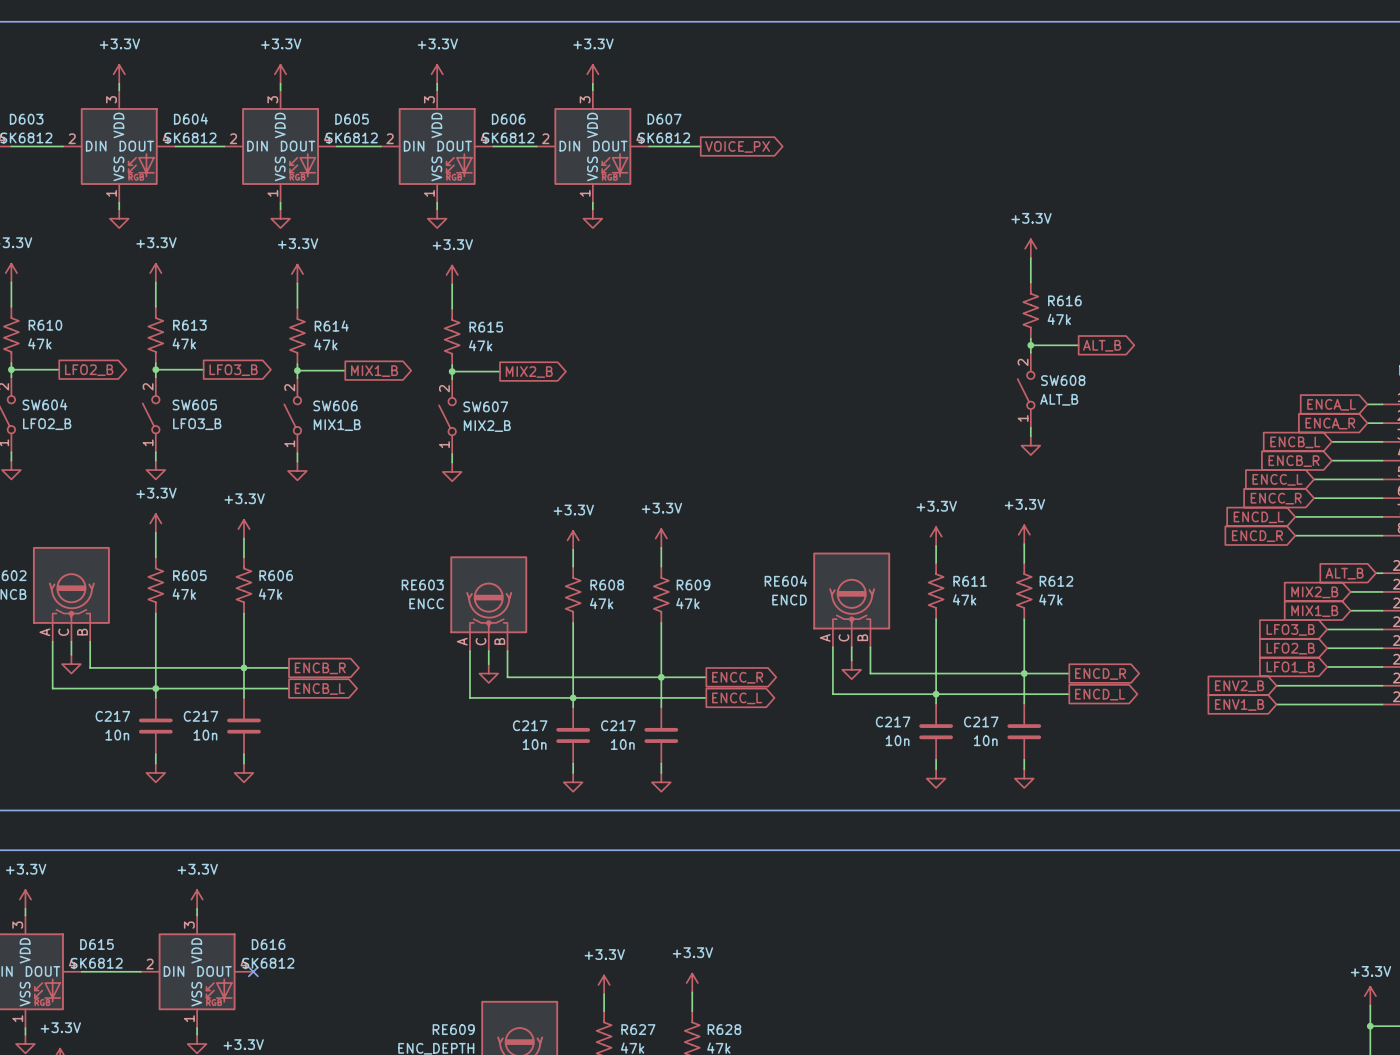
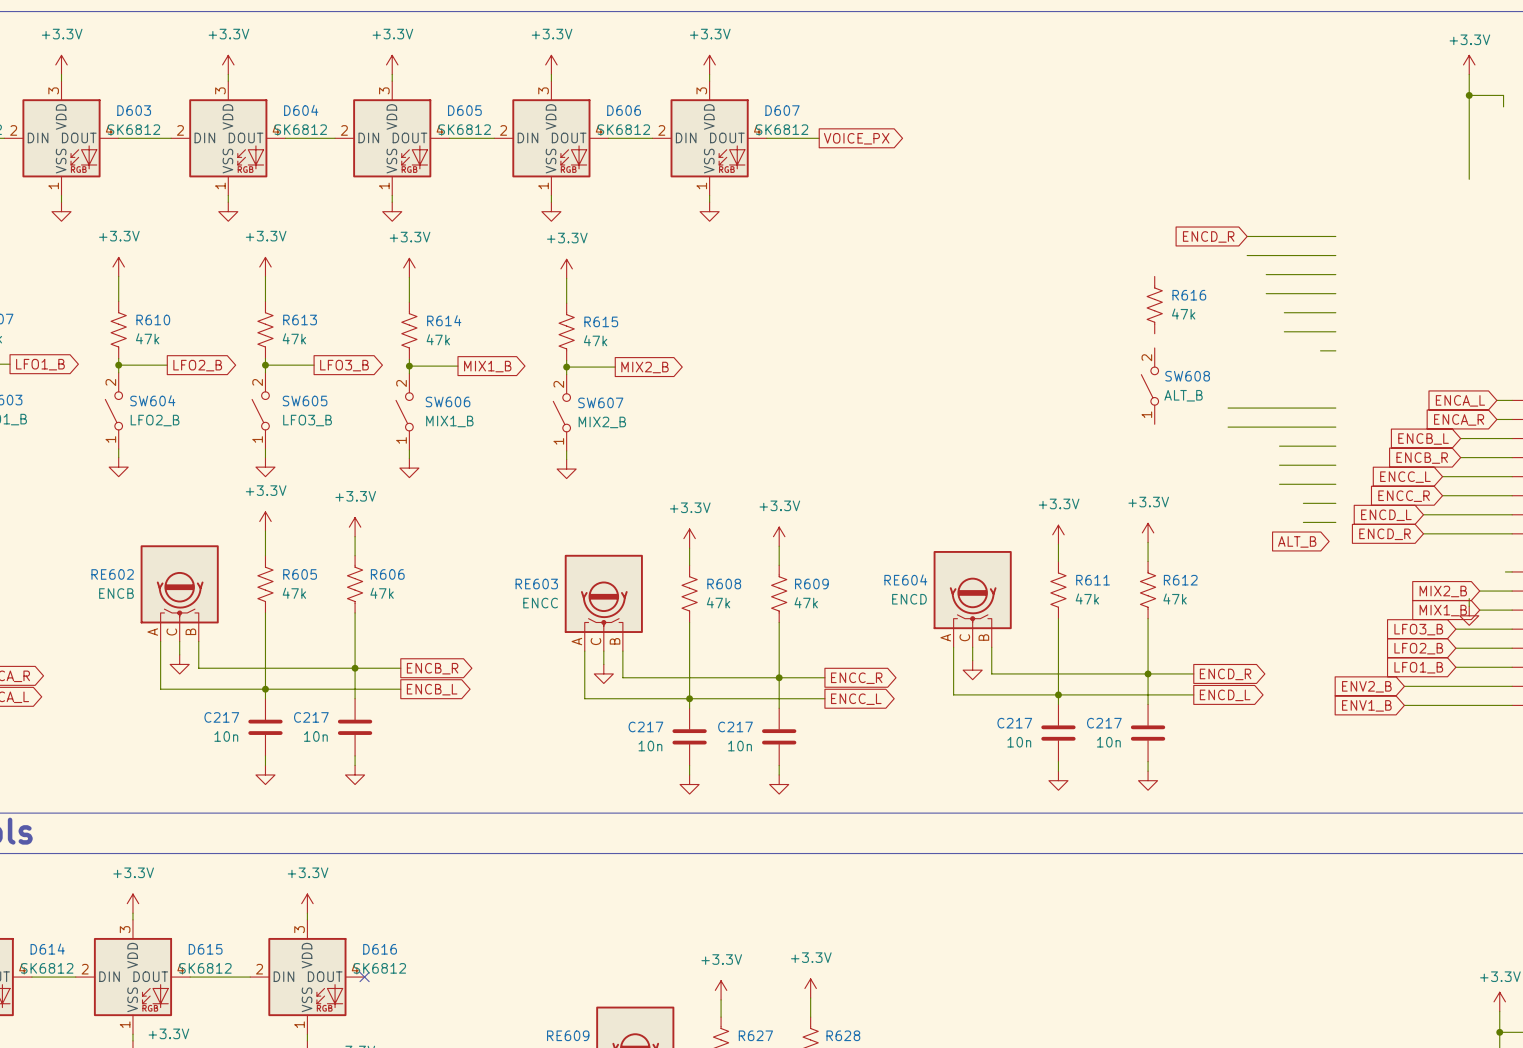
power symbol: none -> +3.3V (1469, 64)
wire: none -> (1469, 74) (1469, 179)
wire: none -> (1469, 95) (1503, 95) (1503, 106)
junction: none -> (1469, 95)
global label: none -> ENCD_R (1208, 236)
wire: none -> (1247, 236) (1335, 236)
power symbol: +3.3V (1030, 248) -> none
wire: (1030, 258) (1030, 282) -> none
wire: none -> (1247, 255) (1335, 255)
wire: none -> (1266, 274) (1335, 274)
wire: none -> (1266, 293) (1335, 293)
wire: none -> (1284, 312) (1335, 312)
wire: none -> (1284, 331) (1335, 331)
wire: (1030, 338) (1030, 352) -> none
wire: (1030, 345) (1078, 345) -> none
junction: (1030, 345) -> none
global label: ALT_B (1102, 345) -> none
wire: none -> (1320, 350) (1335, 350)
wire: none -> (1228, 408) (1335, 408)
wire: (1030, 427) (1030, 436) -> none
wire: none -> (1228, 427) (1335, 427)
power symbol: (1030, 445) -> none
wire: none -> (1279, 446) (1335, 446)
wire: none -> (1279, 465) (1335, 465)
wire: none -> (1279, 484) (1335, 484)
wire: none -> (1303, 503) (1335, 503)
wire: none -> (1303, 522) (1335, 522)
global label: none -> ALT_B (1297, 541)
global label: ALT_B (1344, 573) -> none
wire: none -> (1469, 598) (1469, 606)
power symbol: none -> (1469, 615)

